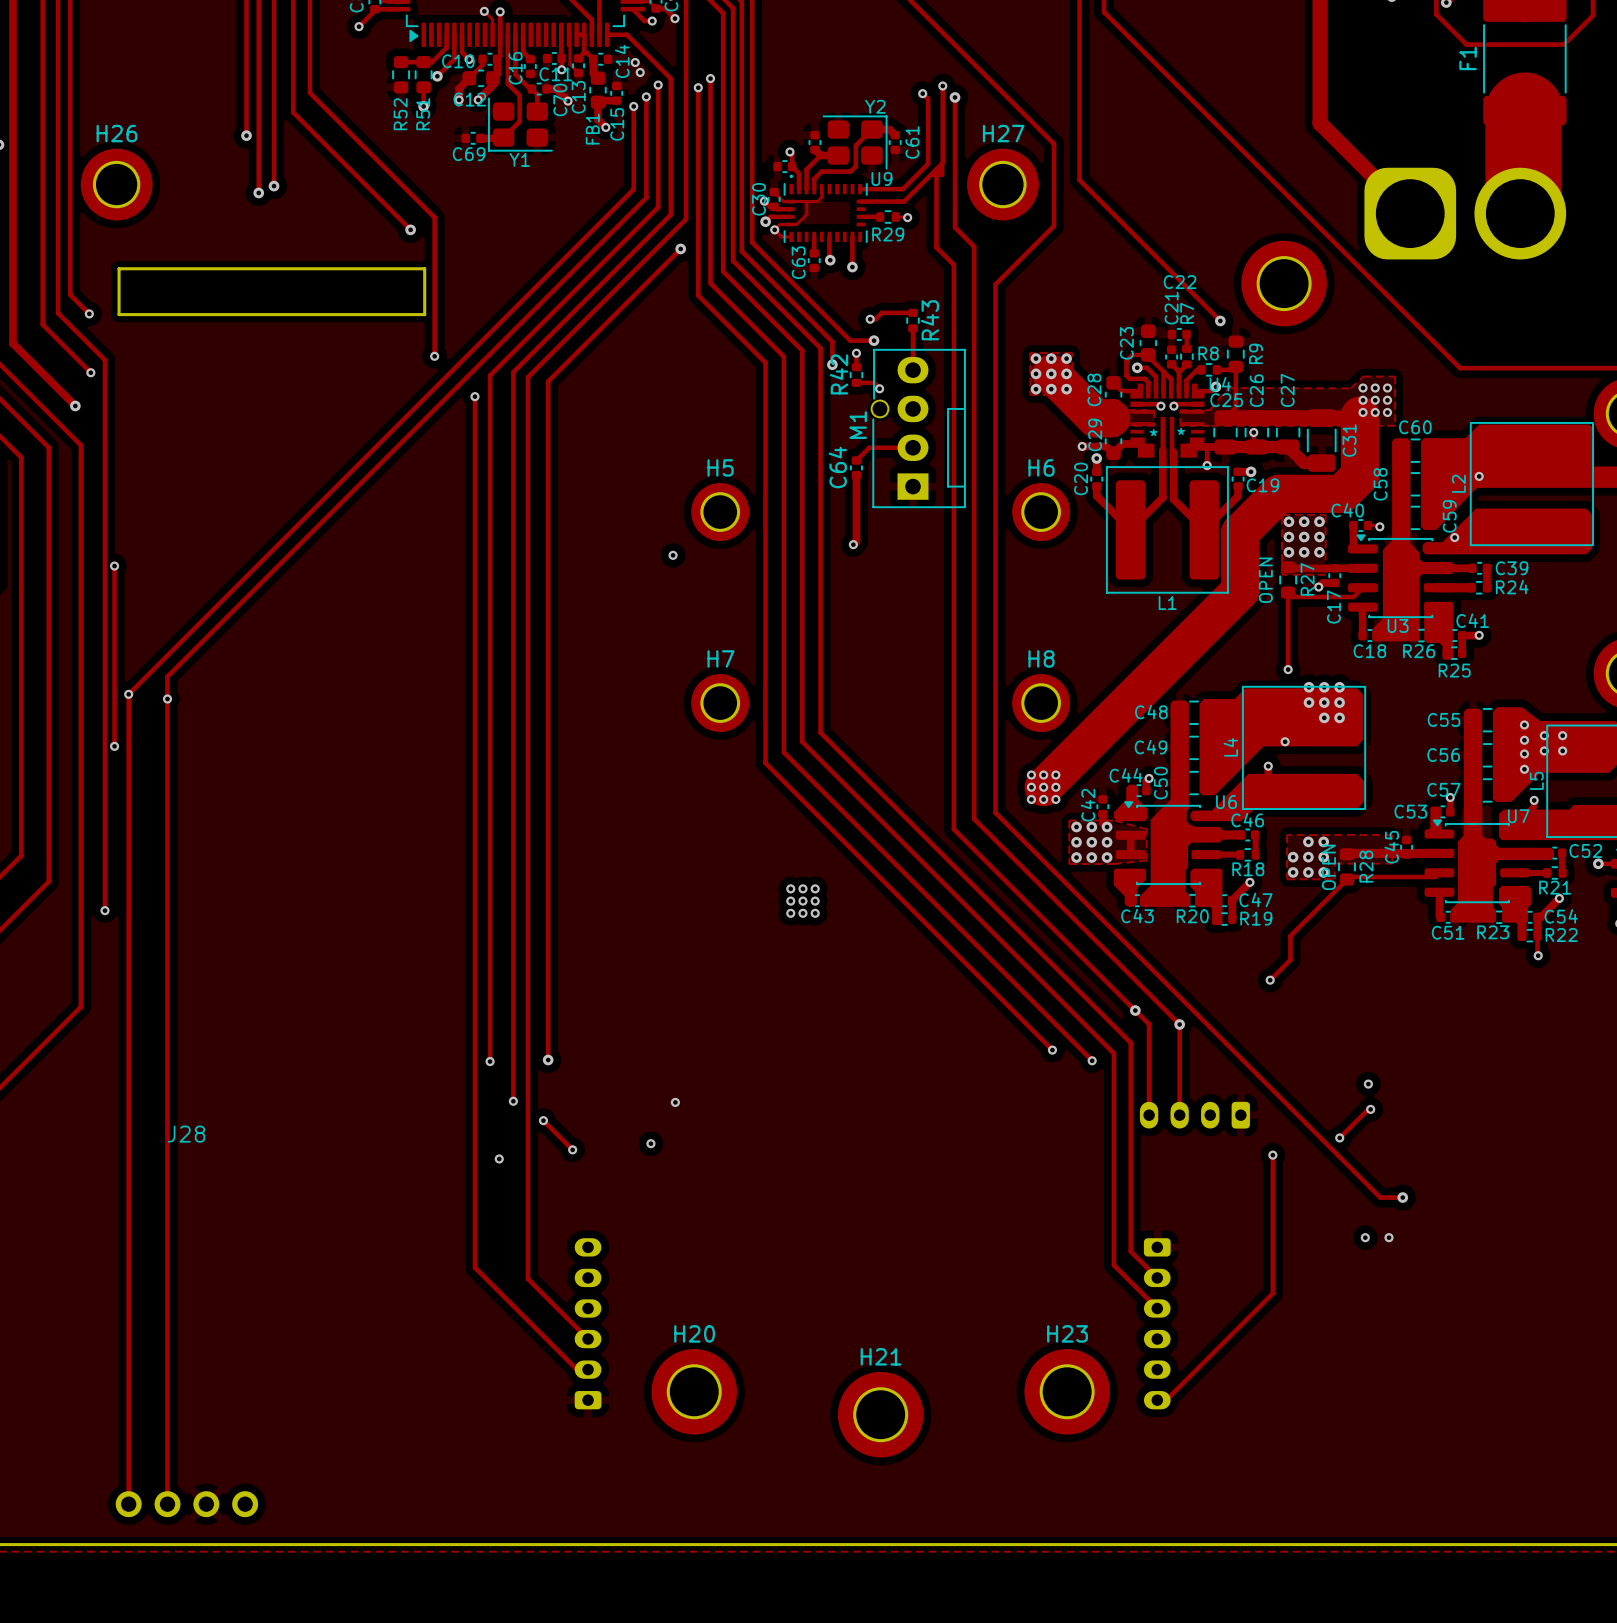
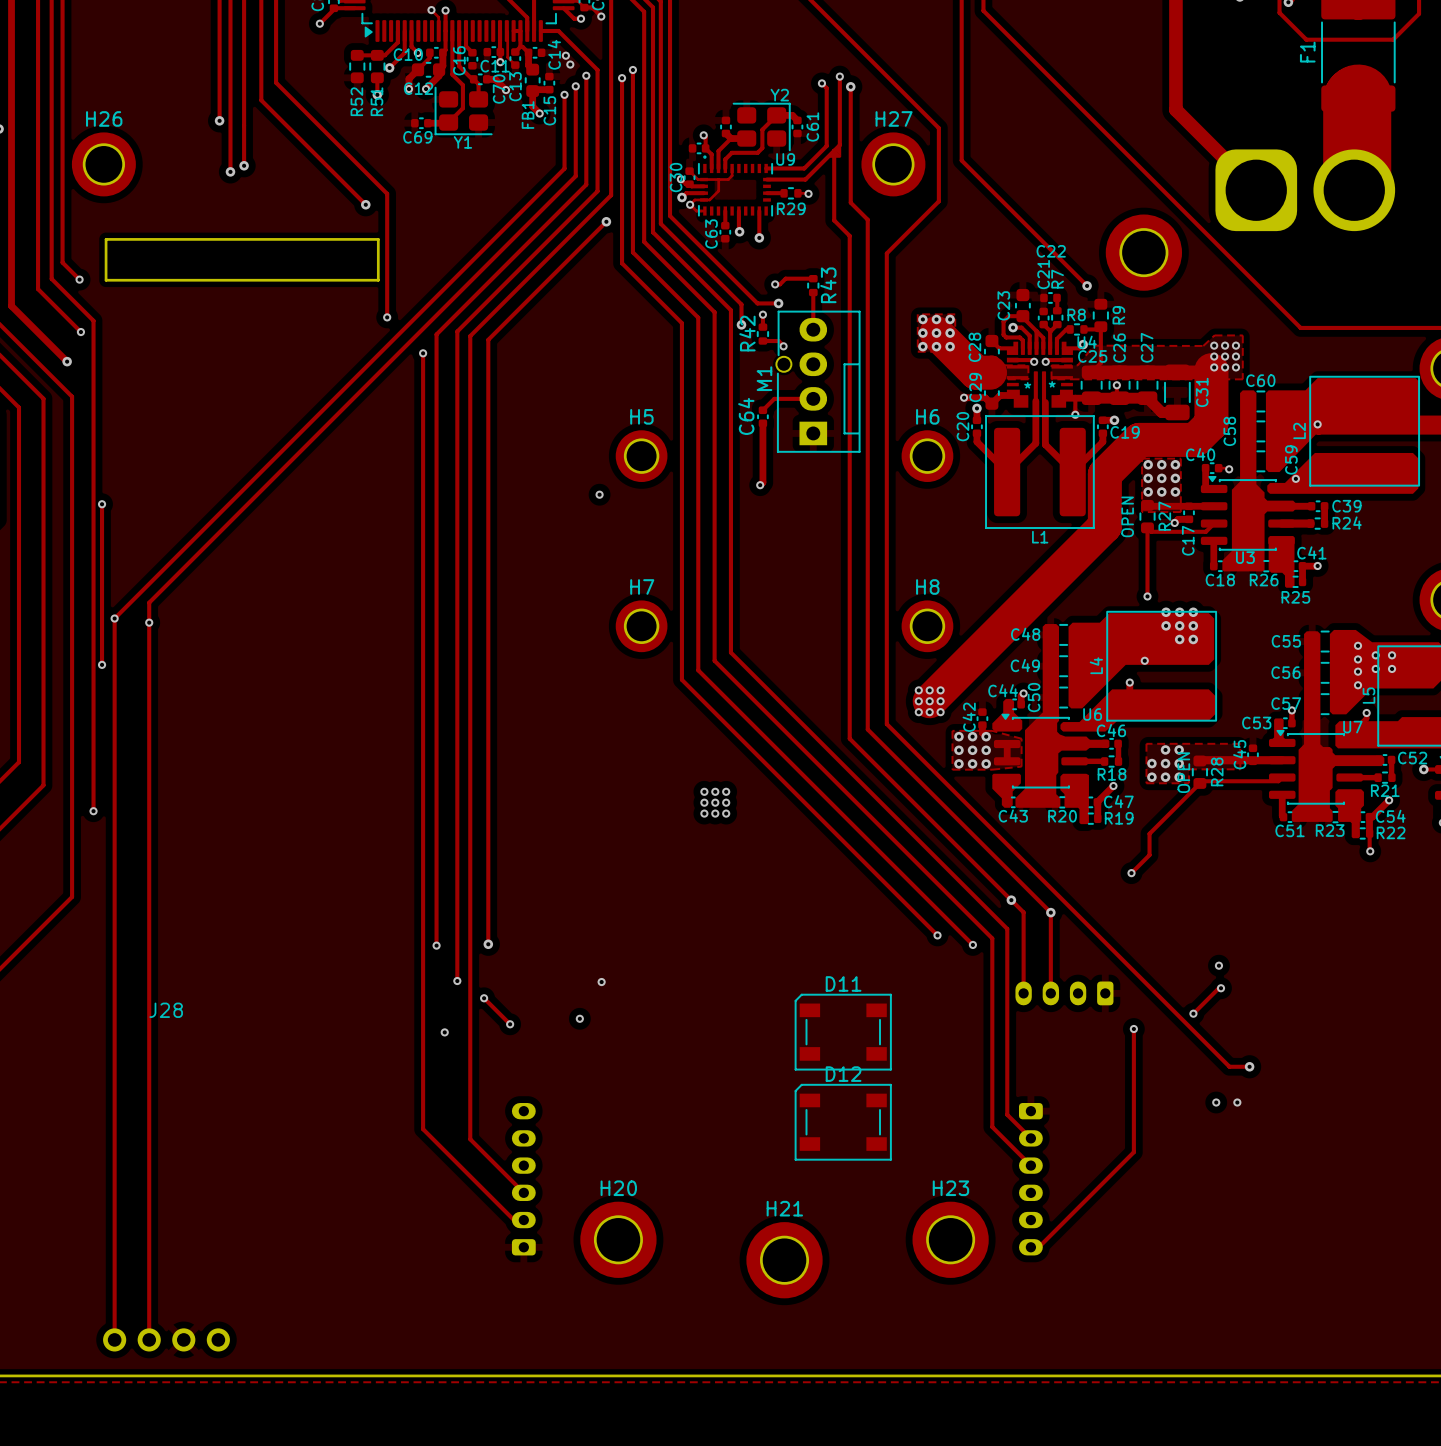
D11: none -> (843, 1032)
D12: none -> (843, 1122)

